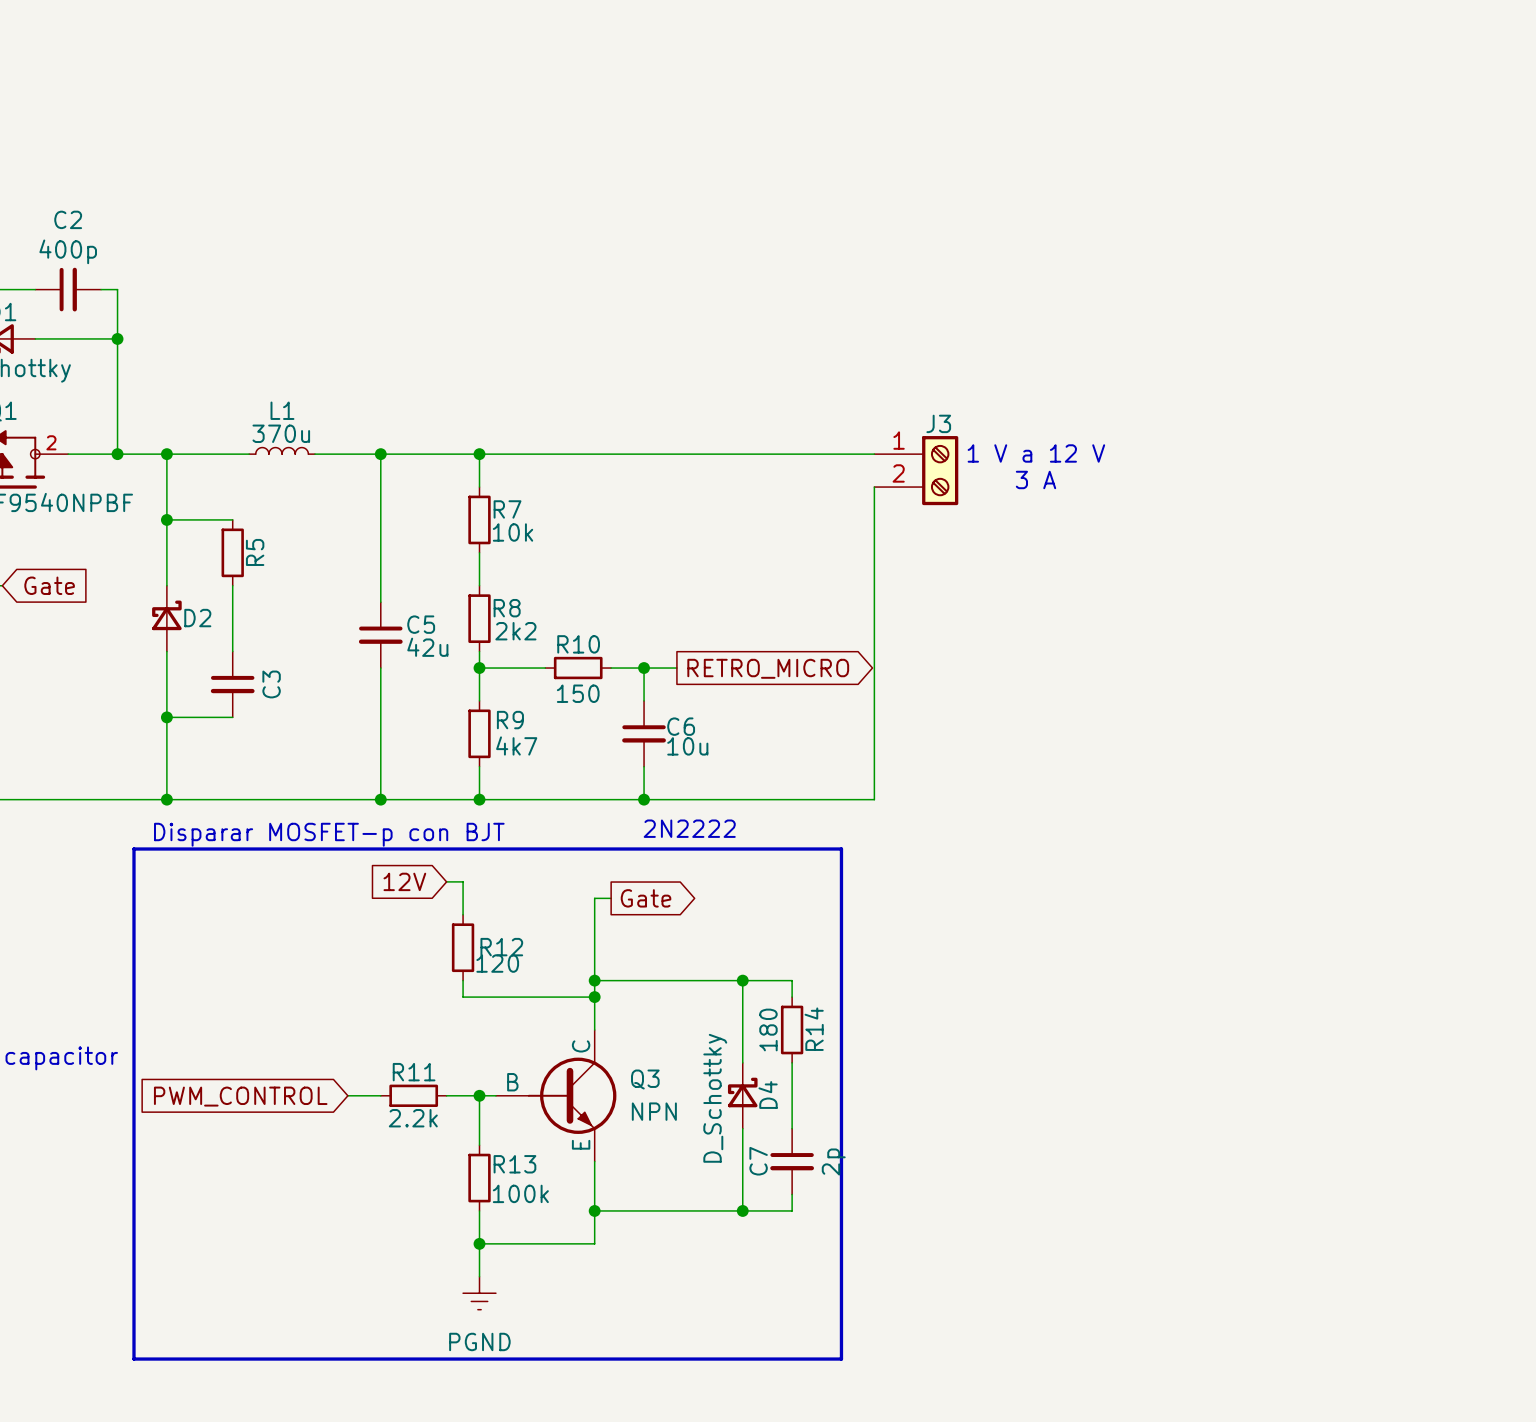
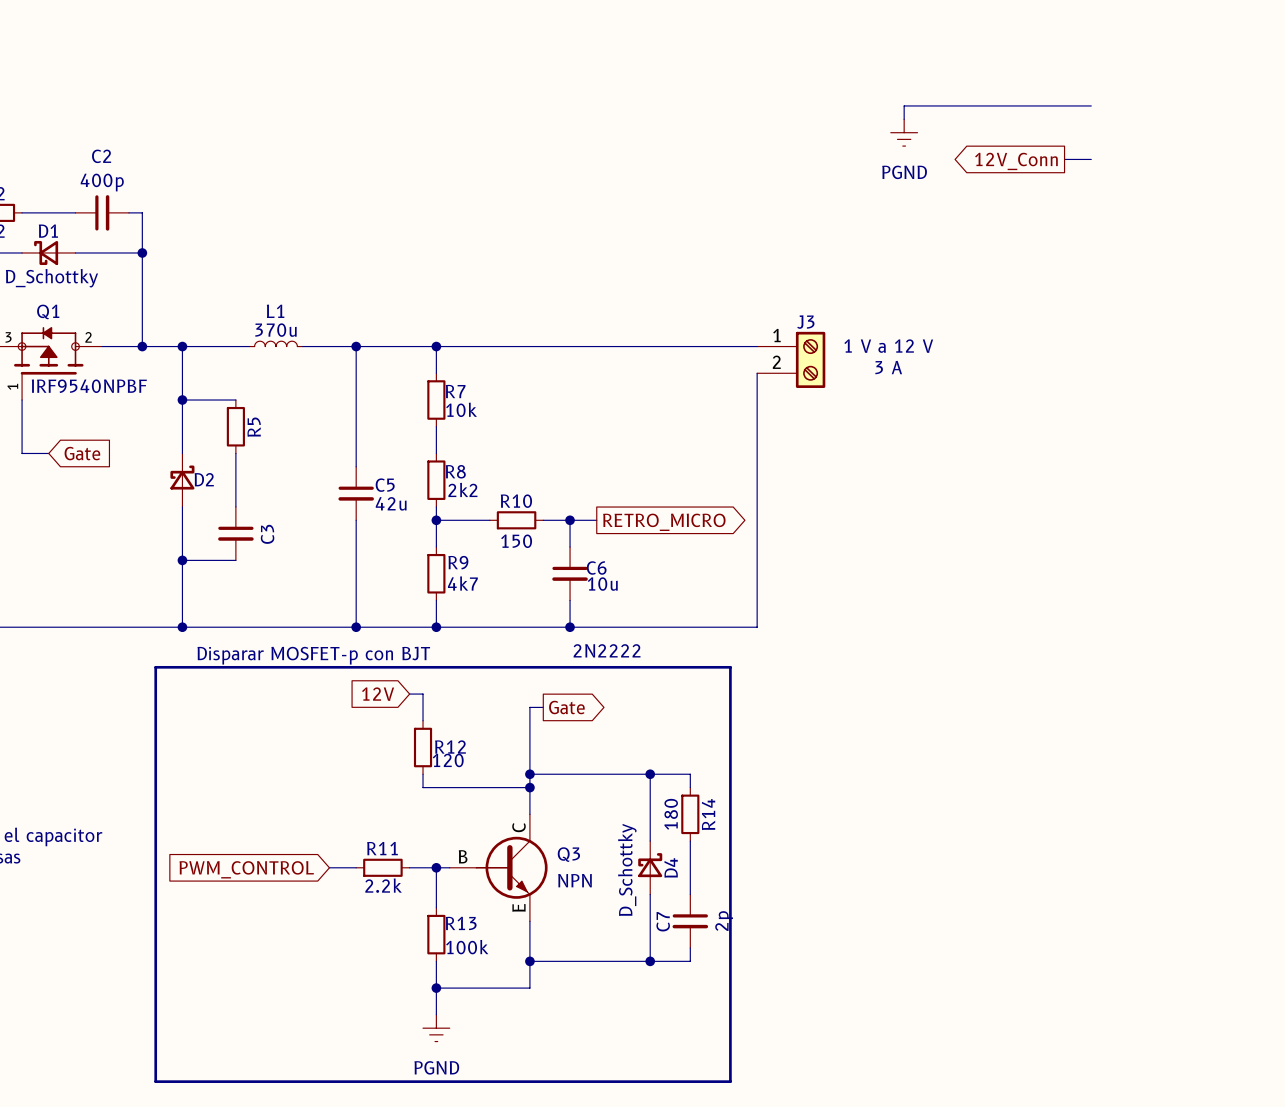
wire: none -> (1091, 105) (904, 105) (904, 119)
power symbol: none -> PGND (904, 132)
wire: none -> (1064, 159) (1091, 159)
global label: none -> 12V_Conn (1016, 161)

